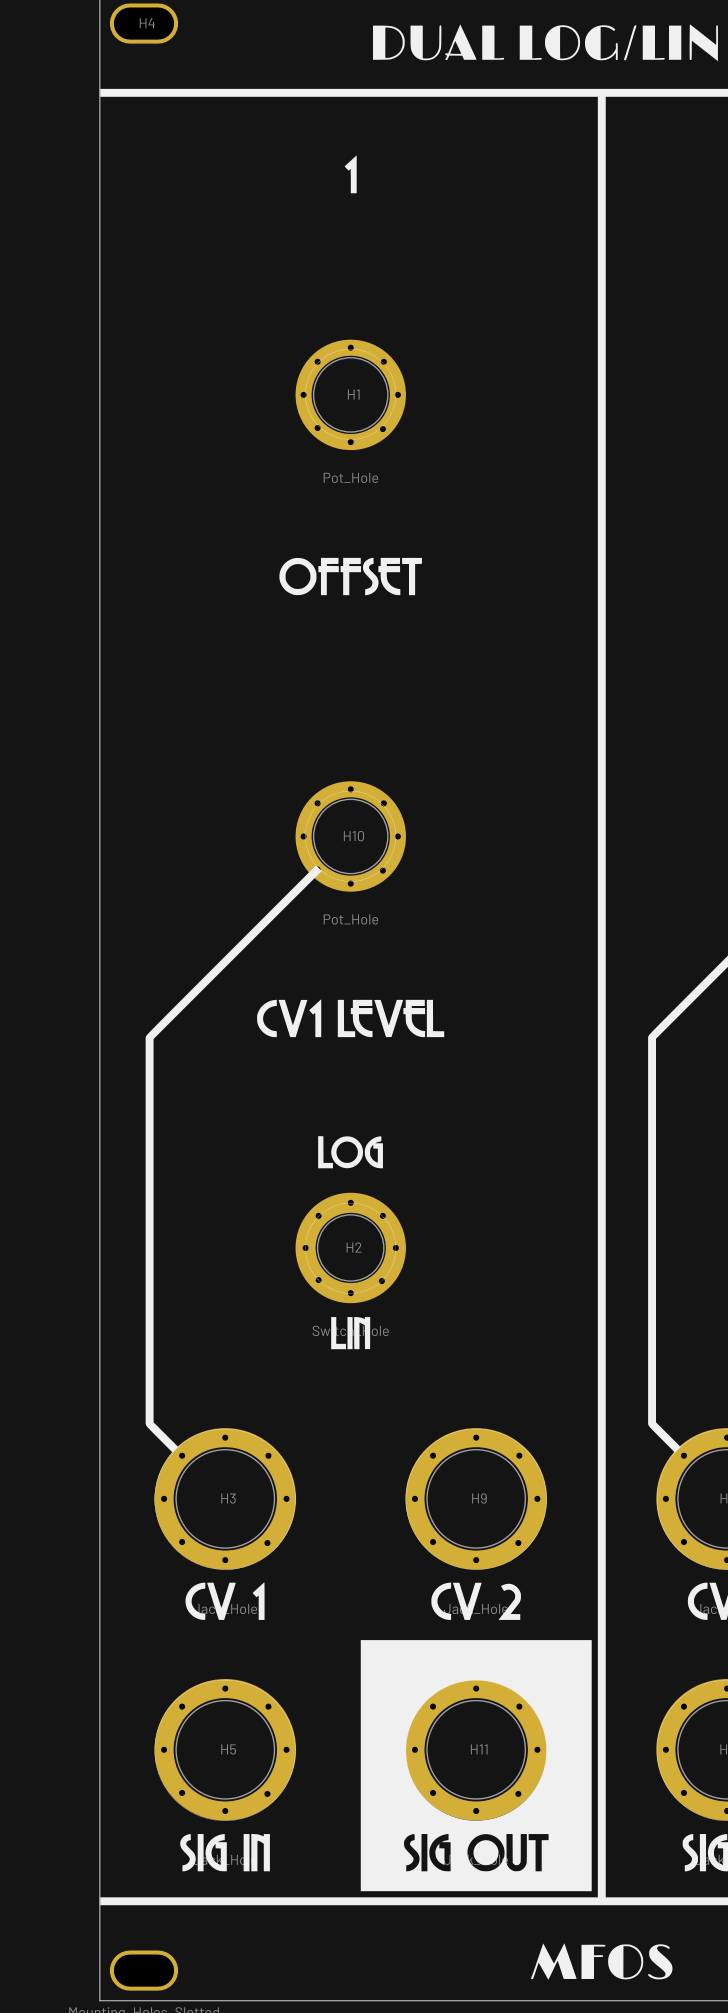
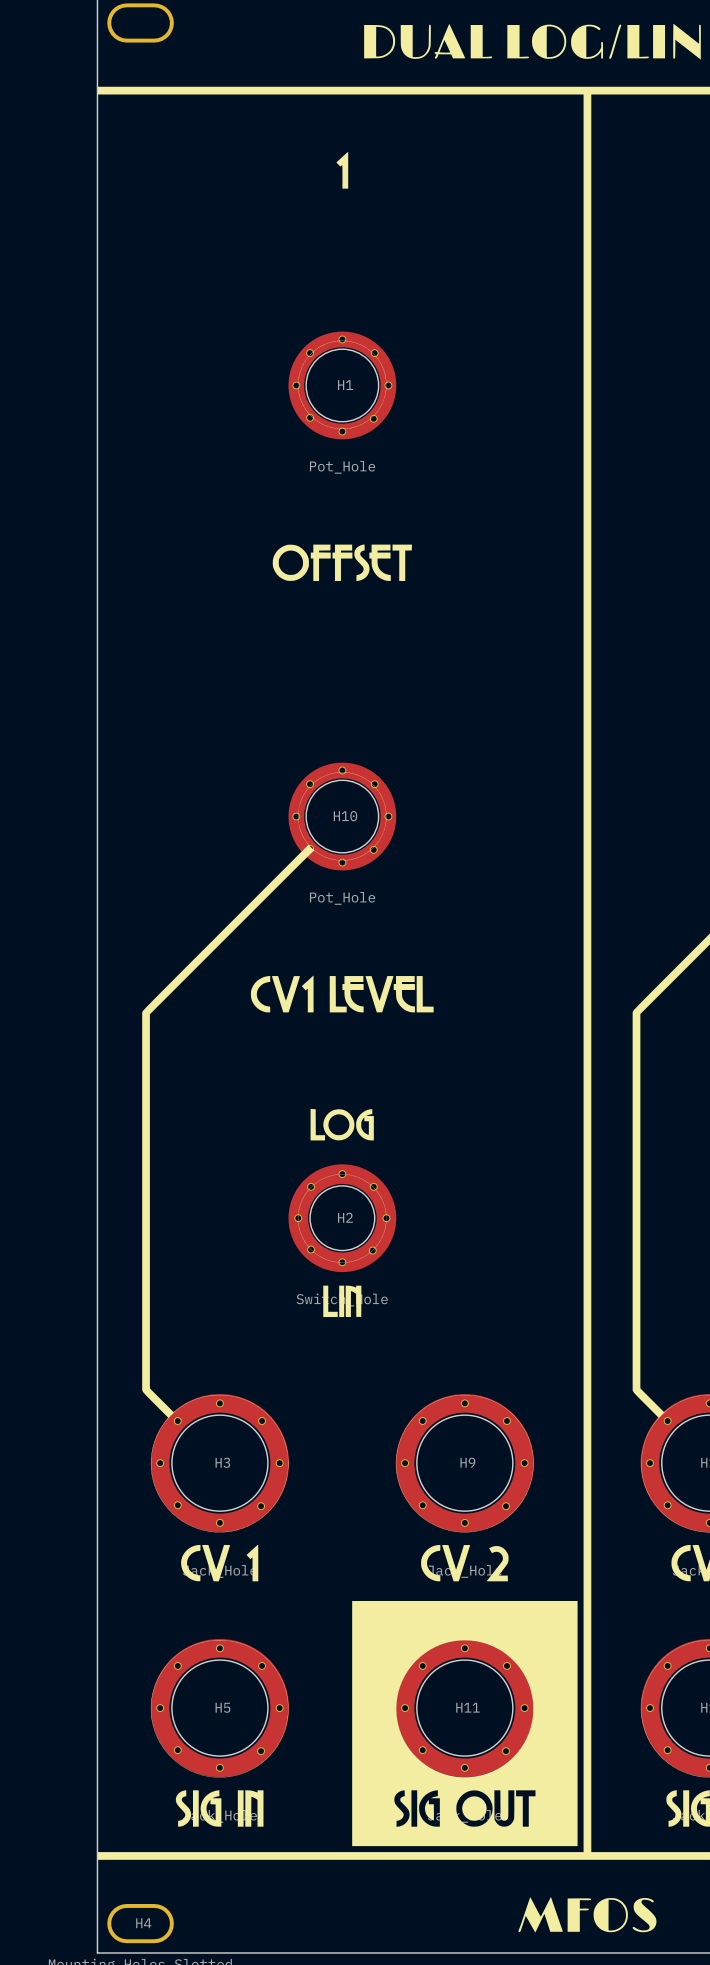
H4 name position: H4 (147, 23) -> H4 (143, 1923)

